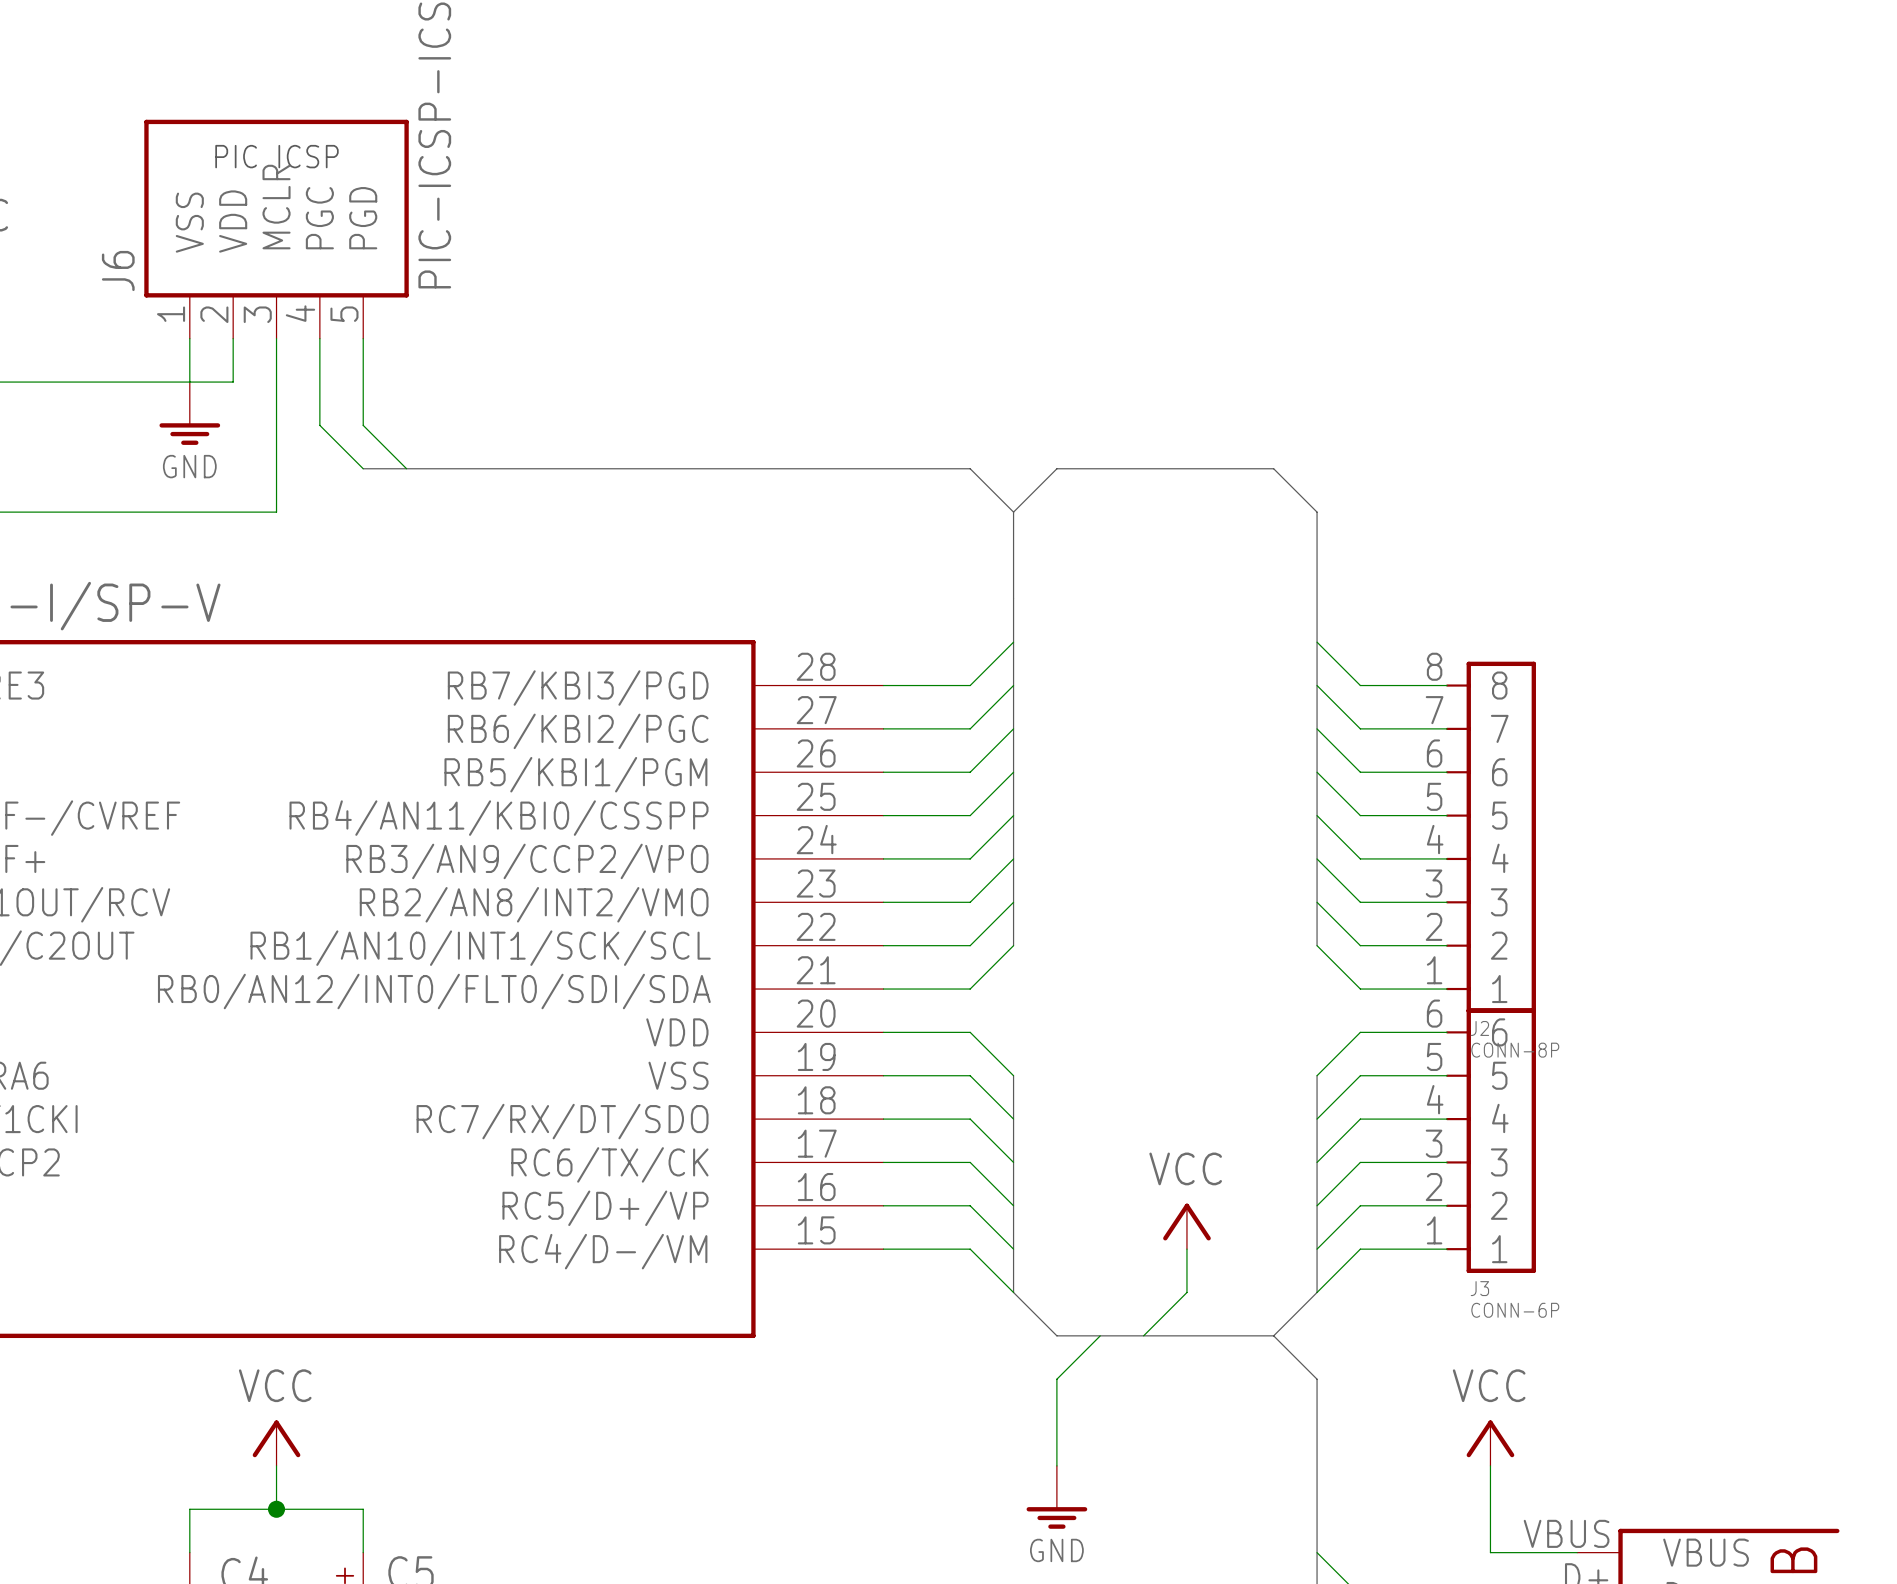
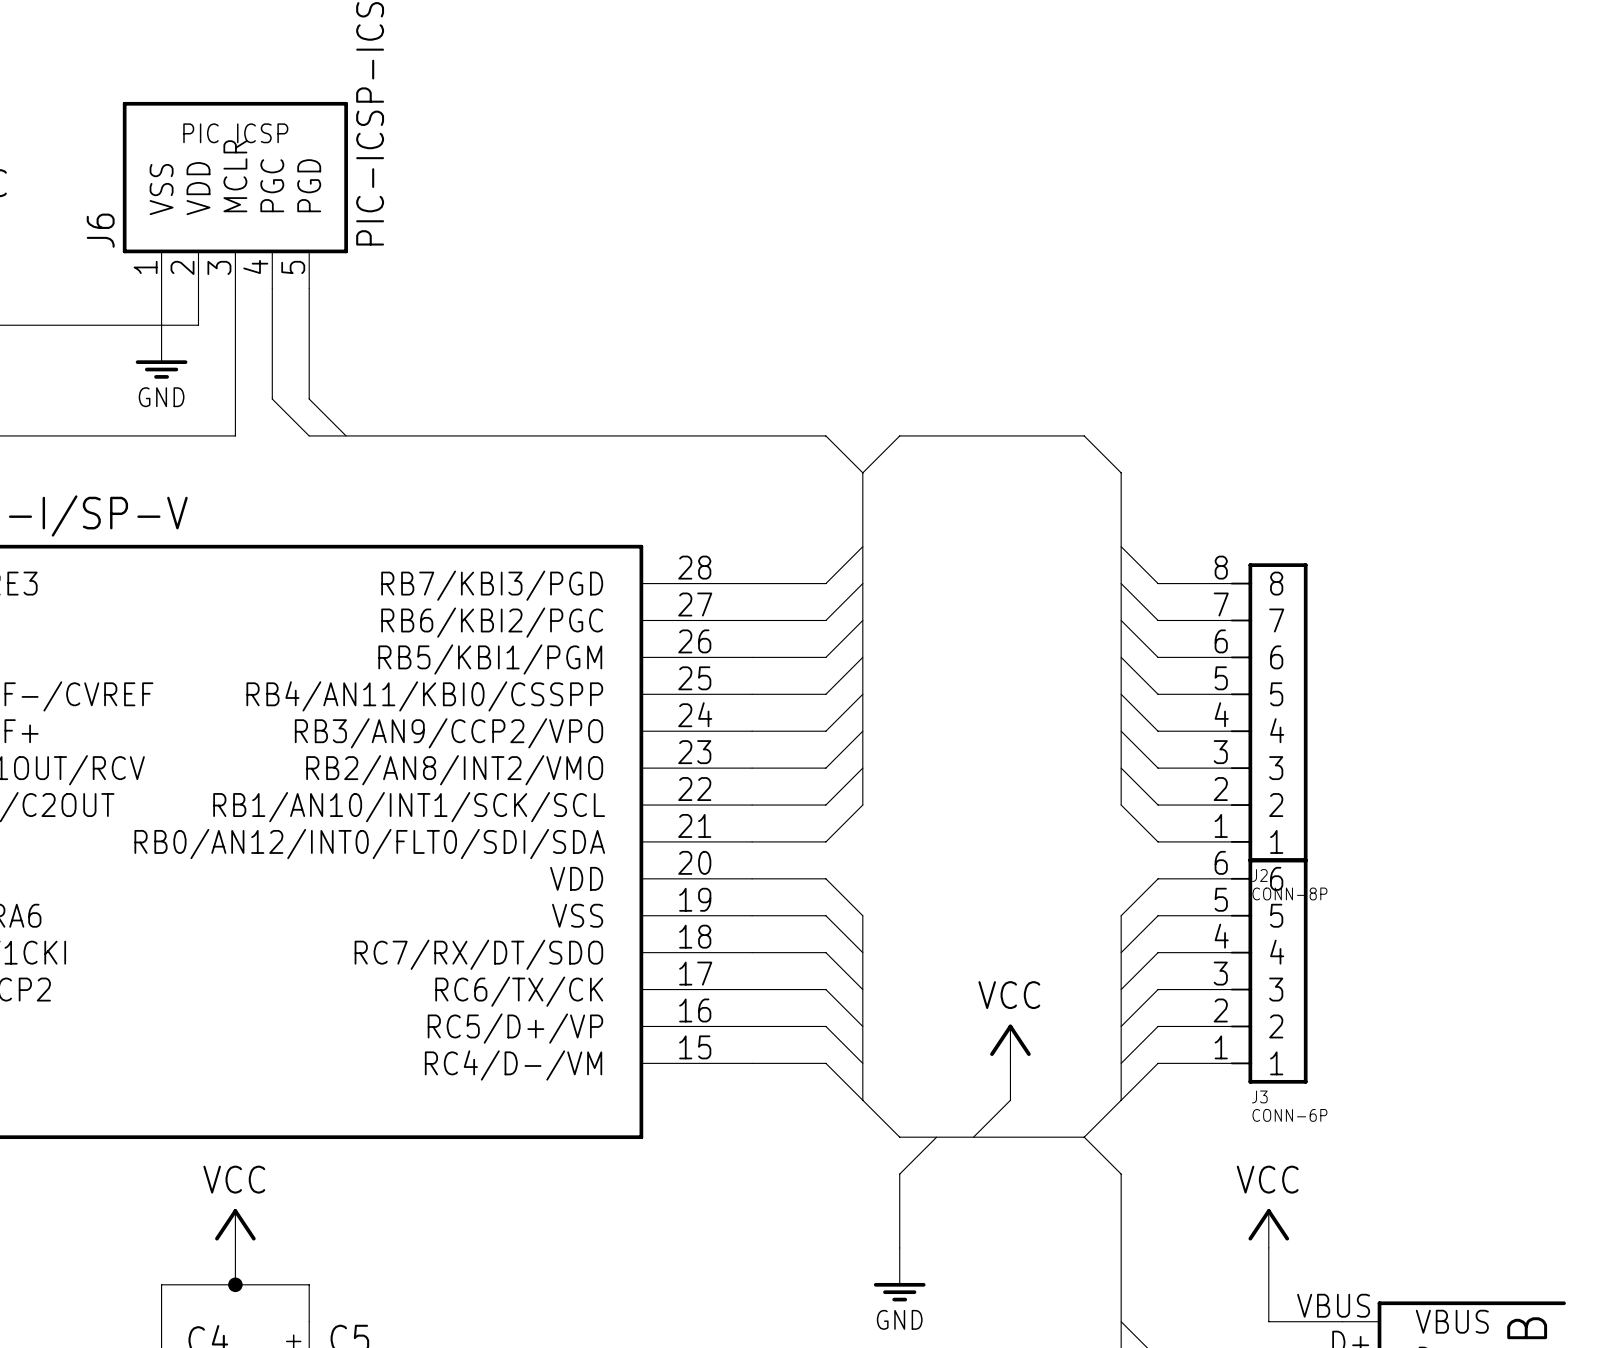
wire: (319, 425) (363, 468) -> (272, 362) (272, 399) (309, 435)
wire: (363, 425) (406, 468) -> (309, 362) (309, 399) (346, 435)
bus: (363, 468) (970, 468) (1013, 512) -> none
bus: (1013, 512) (1056, 468) (1273, 468) (1317, 512) (1317, 555) -> (309, 435) (825, 435) (862, 472) (899, 435) (1084, 435) (1121, 472)
bus: (1013, 512) (1013, 555) -> none

